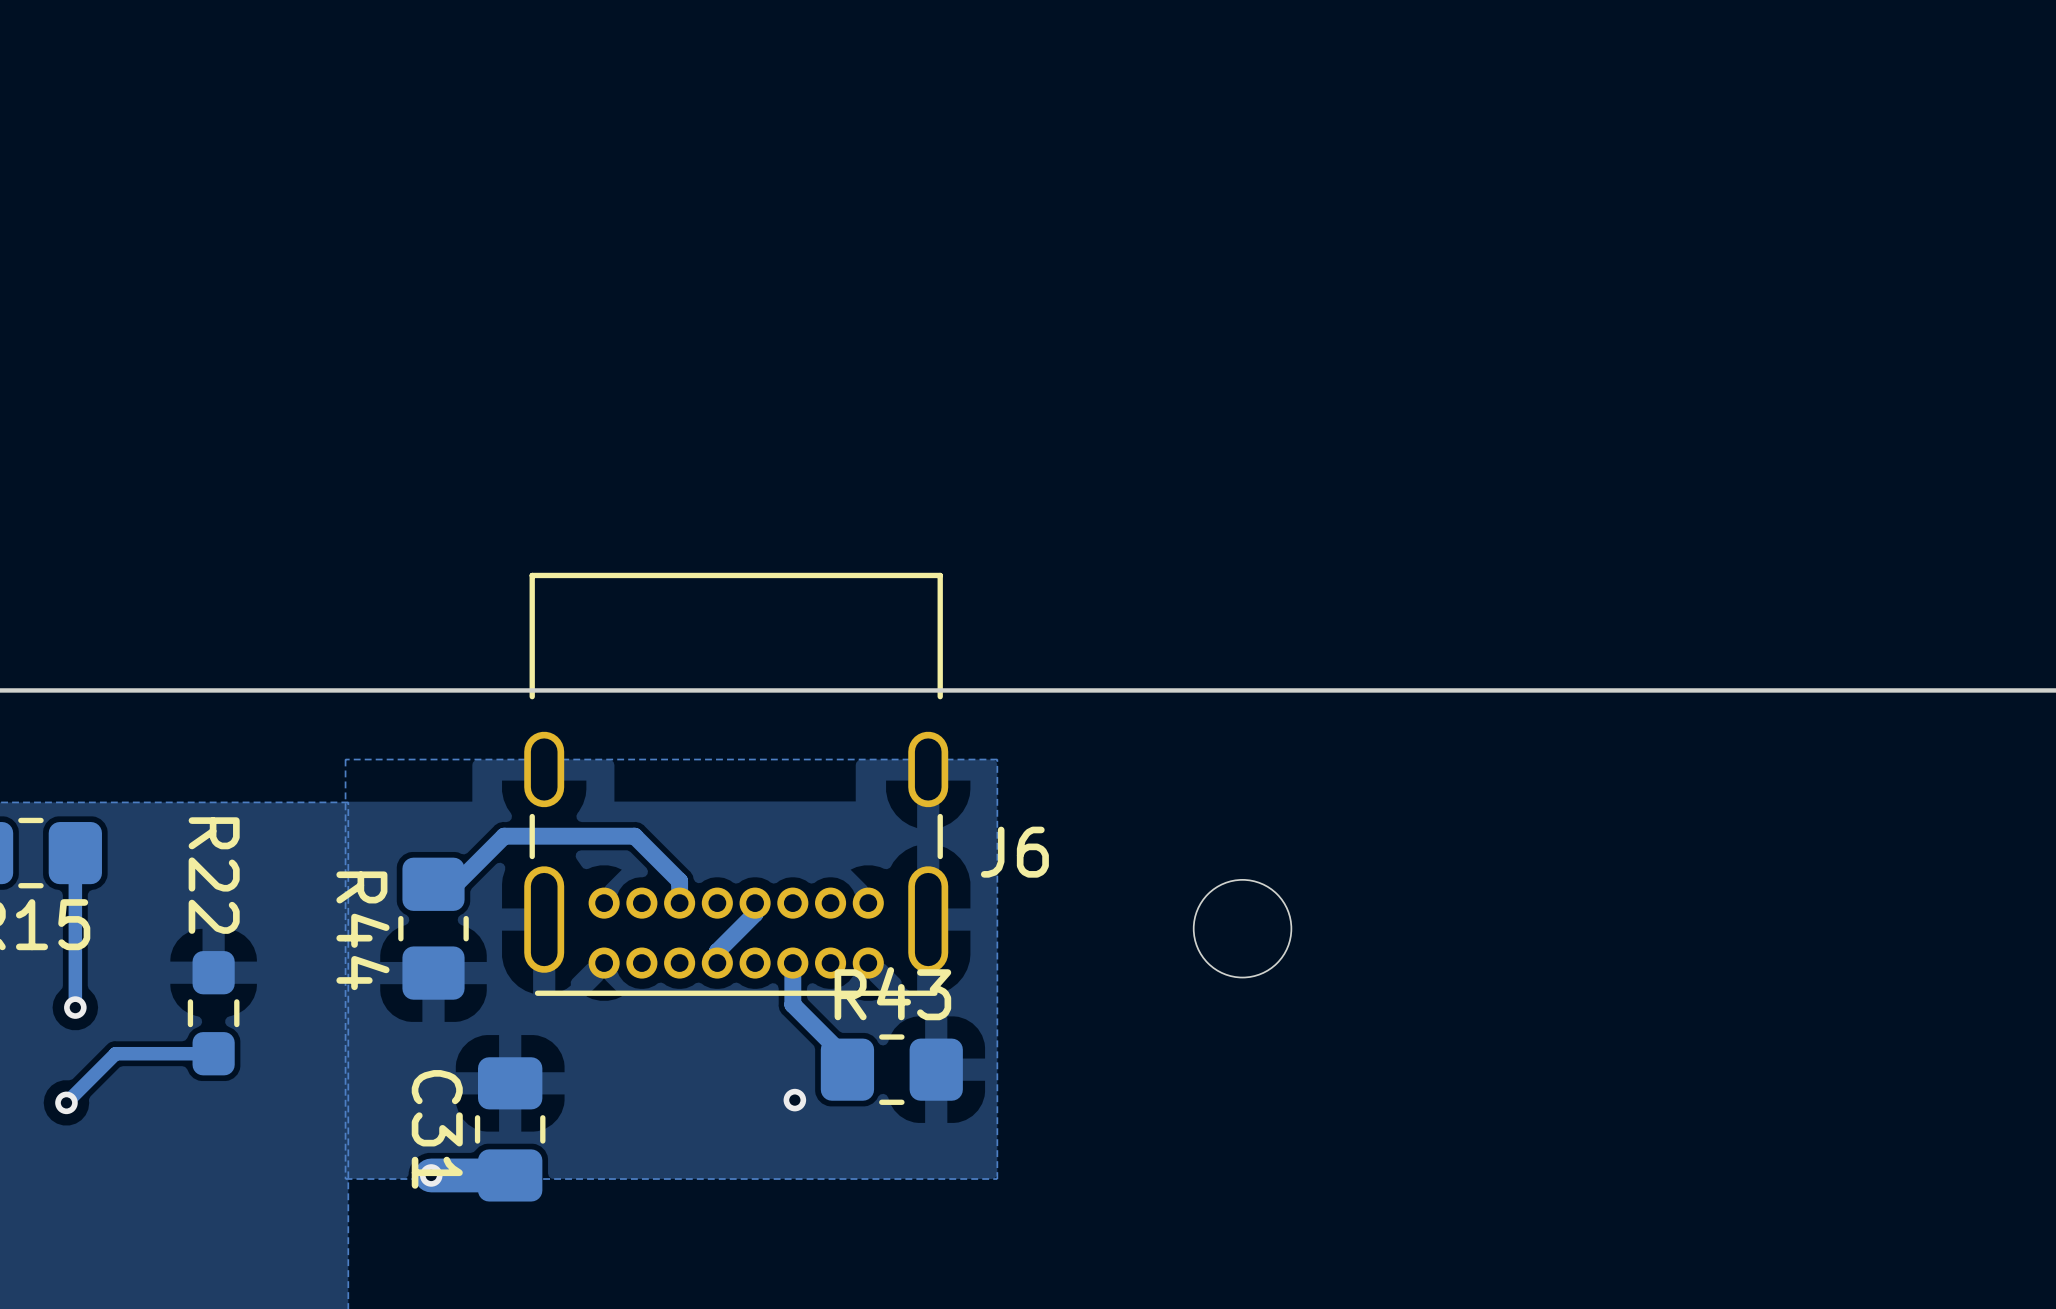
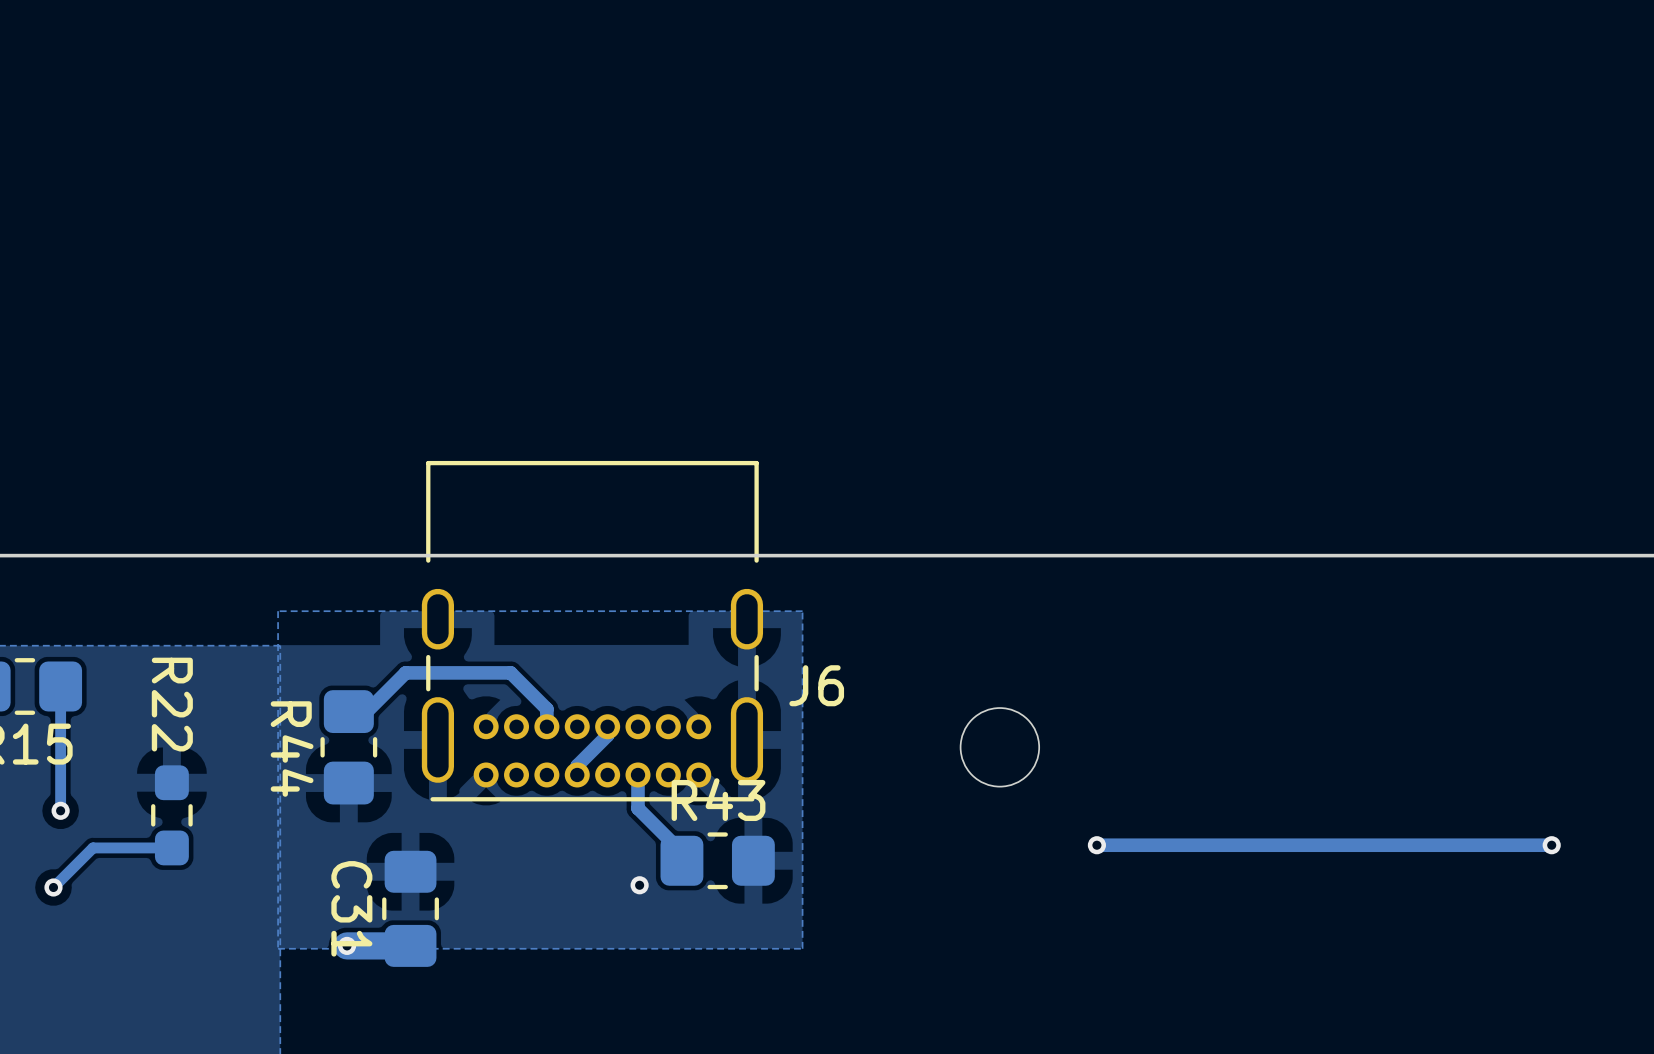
via: none -> (1096, 845)
track: none -> (1551, 845) (1096, 845)
via: none -> (1551, 845)

